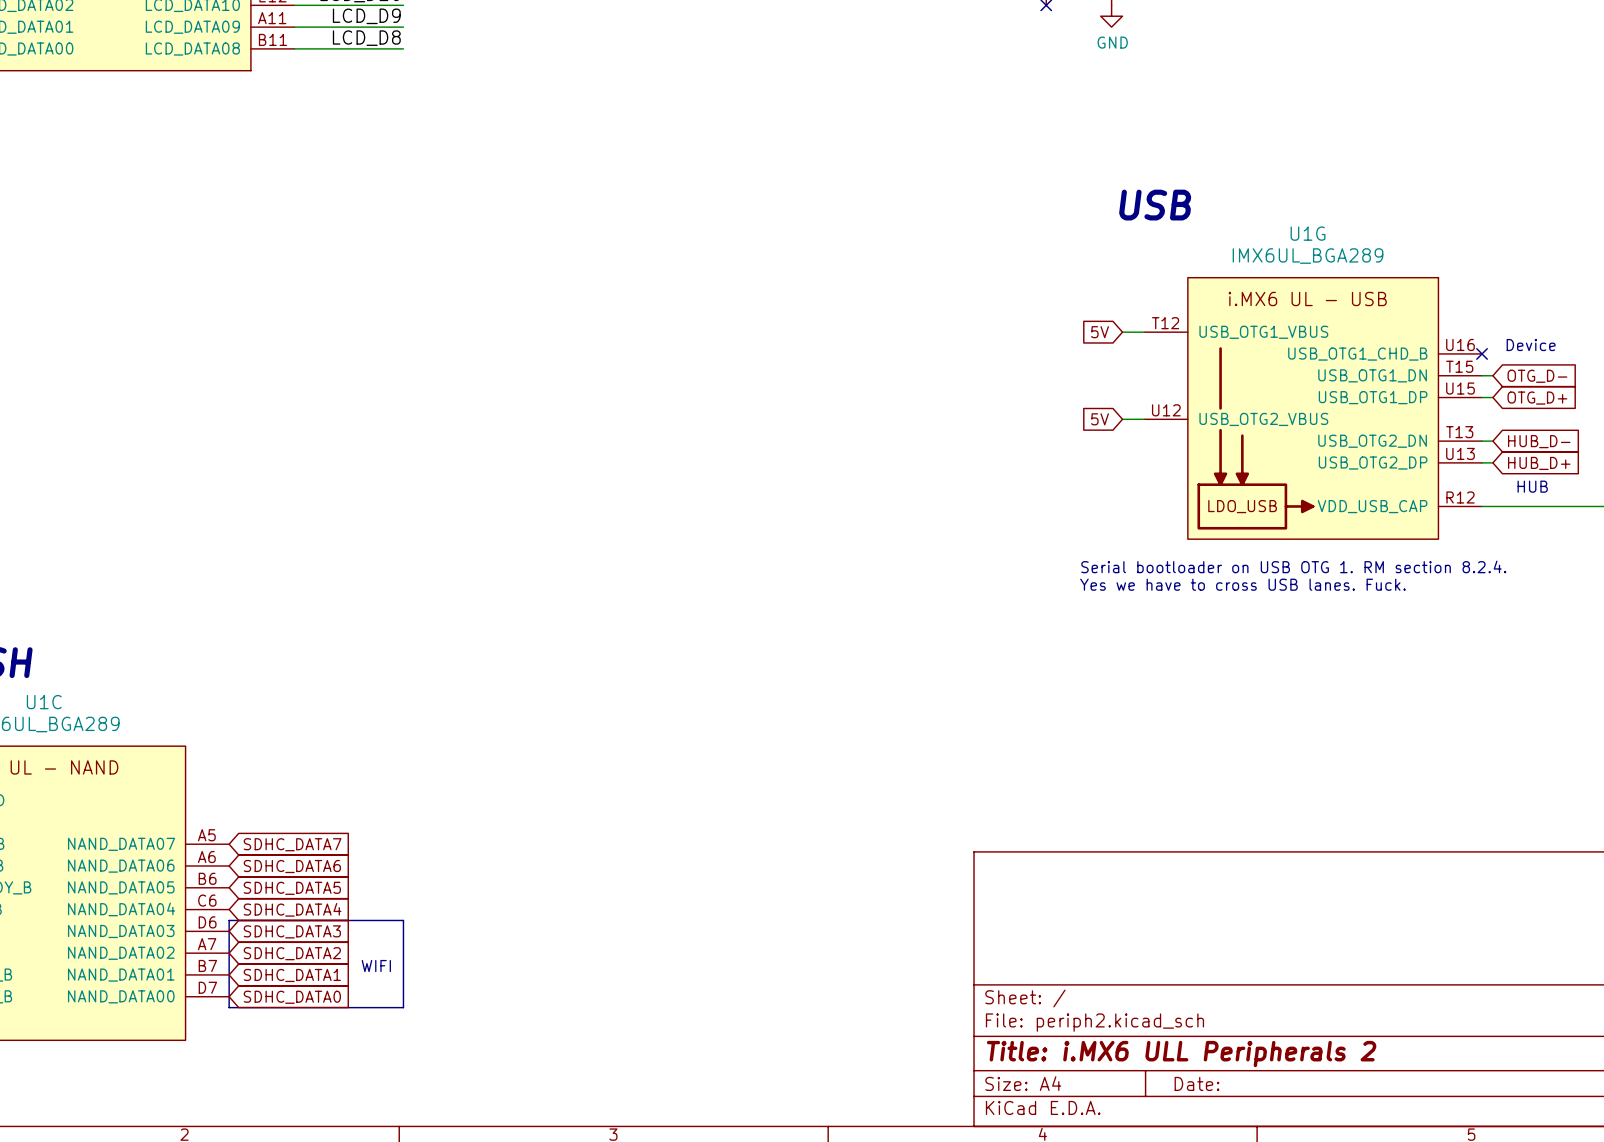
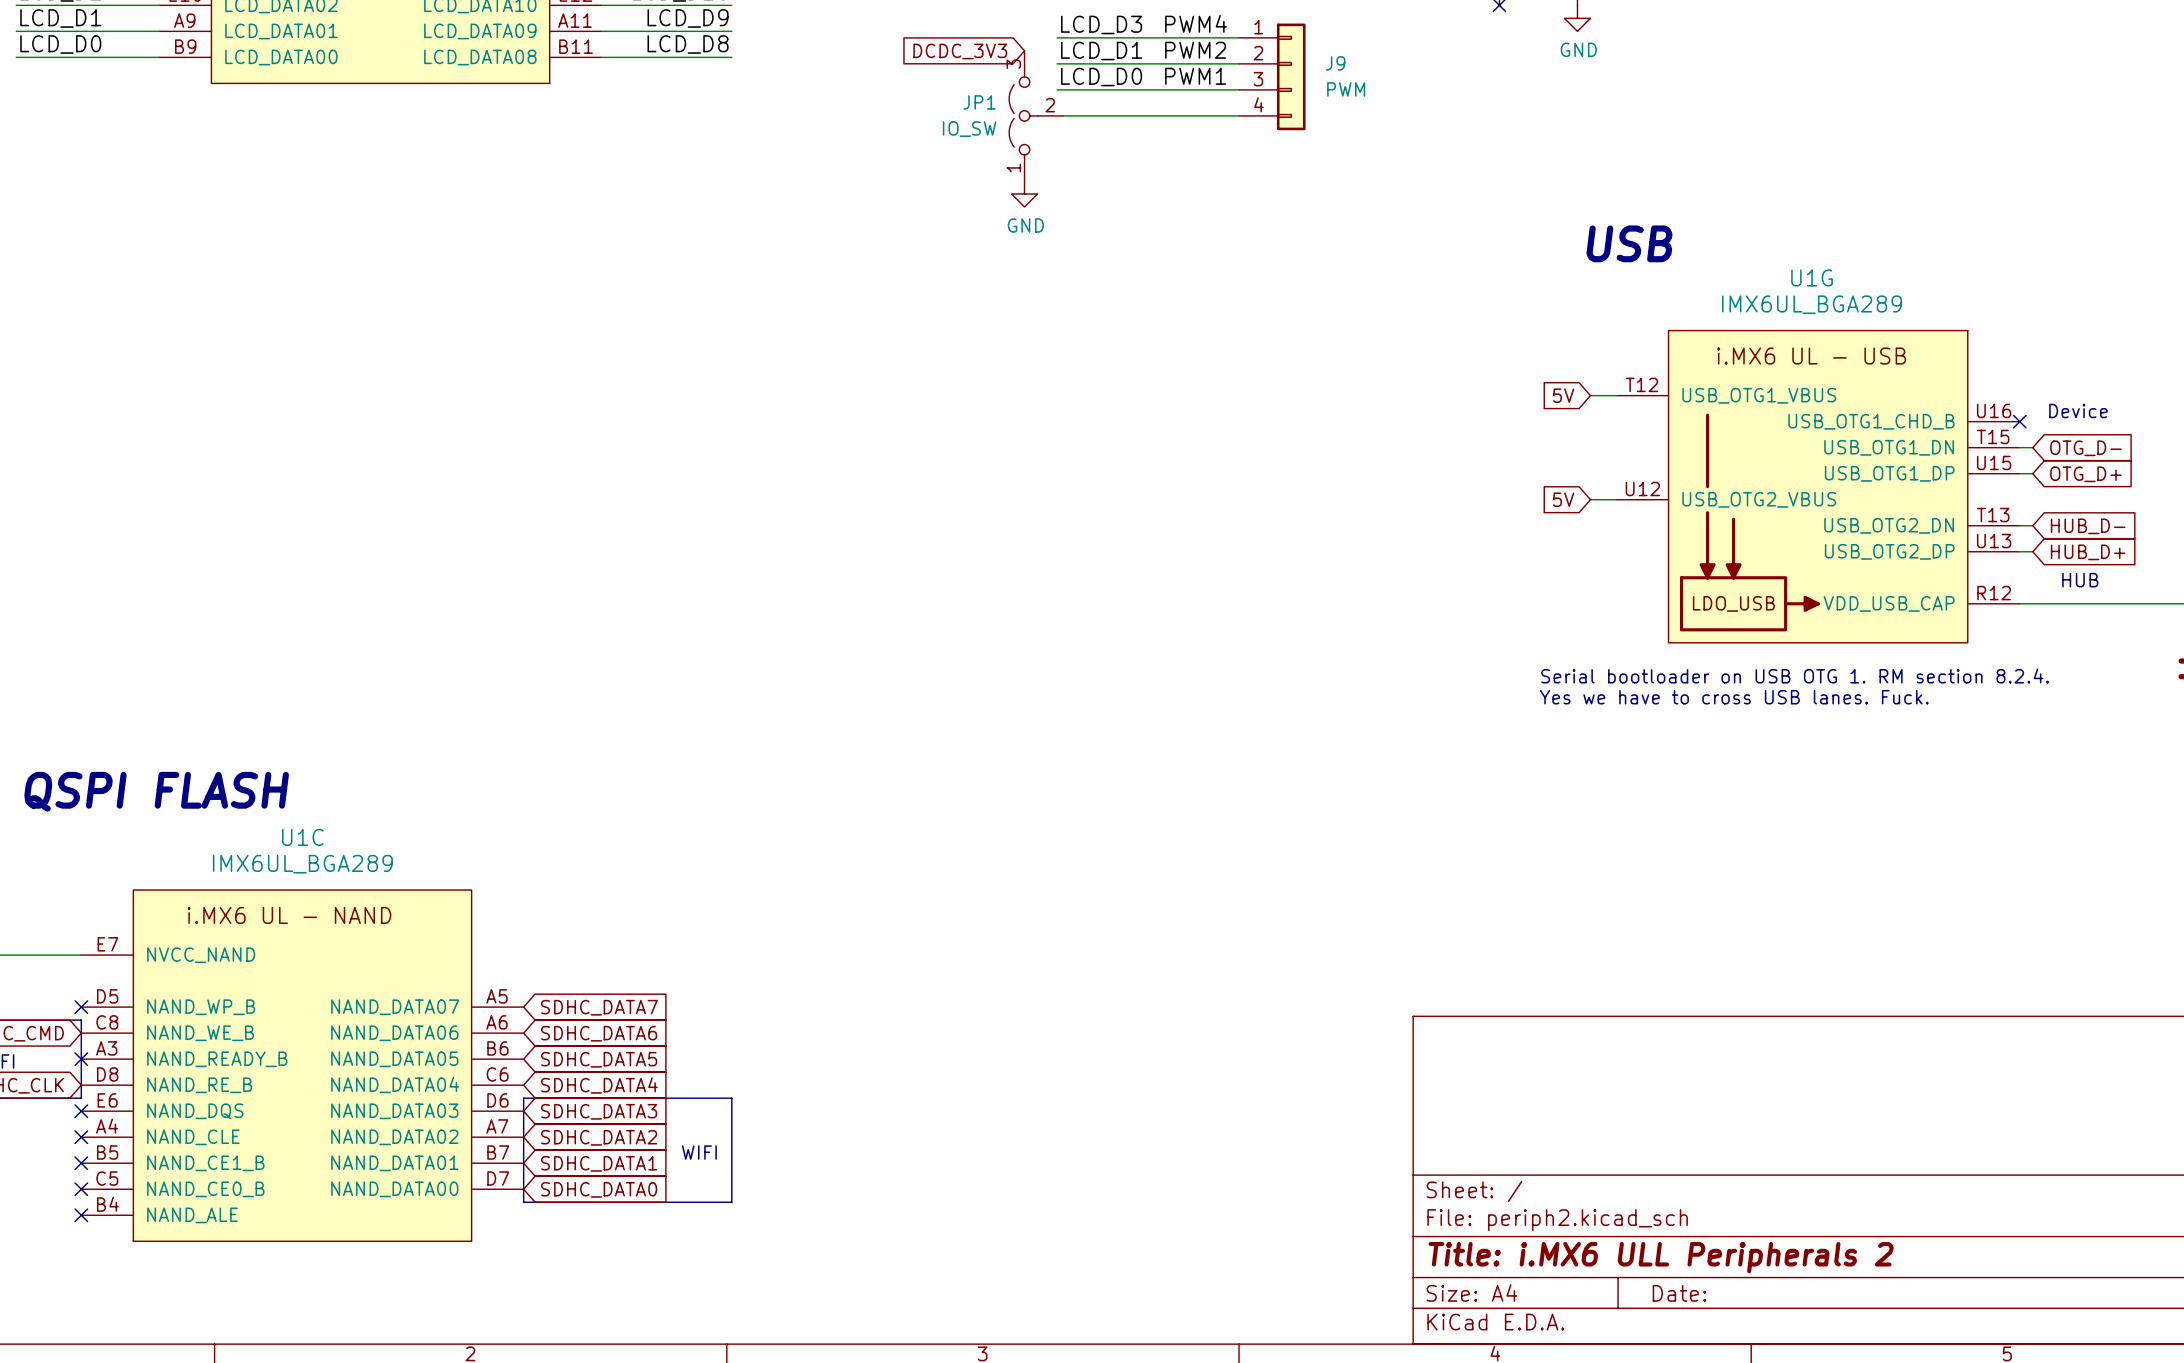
label: none -> PWM4 (1196, 23)
label: none -> LCD_D3 (1101, 24)
wire: none -> (1057, 37) (1239, 37)
label: none -> PWM2 (1195, 50)
global label: none -> DCDC_3V3 (960, 51)
label: none -> LCD_D1 (1101, 51)
wire: none -> (1057, 63) (1239, 63)
label: none -> PWM1 (1195, 76)
label: none -> LCD_D0 (1101, 77)
J9: none -> PWM (1272, 76)
wire: none -> (1057, 89) (1239, 89)
JP1: none -> IO_SW (1036, 115)
wire: none -> (1063, 115) (1239, 115)
power symbol: none -> GND (1024, 193)

